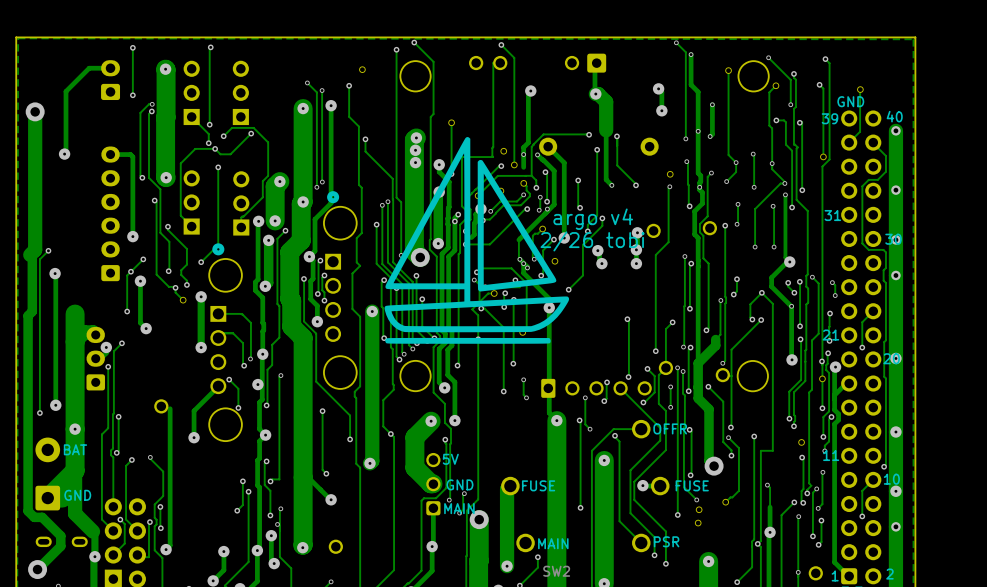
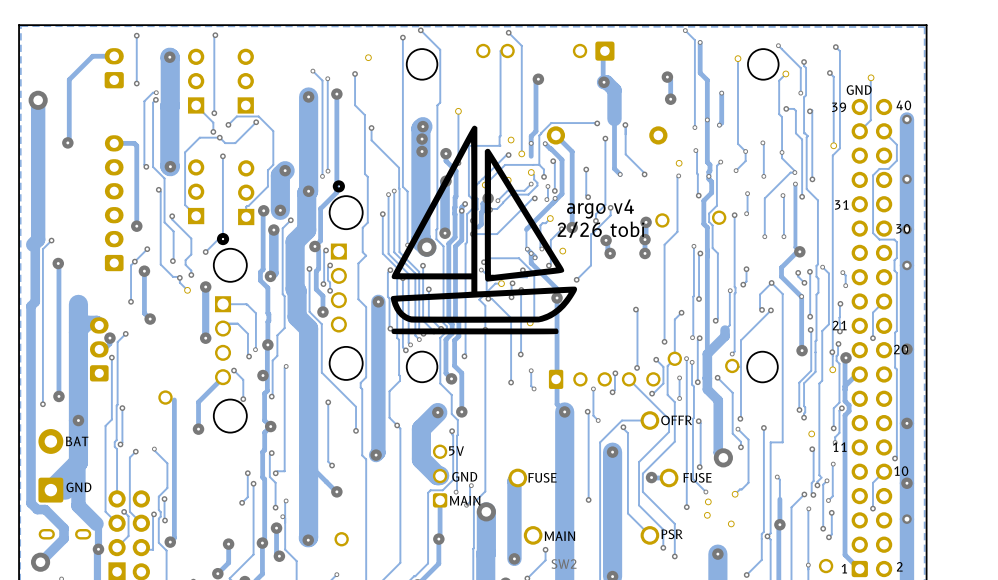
track: (822, 378) (822, 408) -> none
via: (822, 408) -> none
part: none -> (731, 523)

